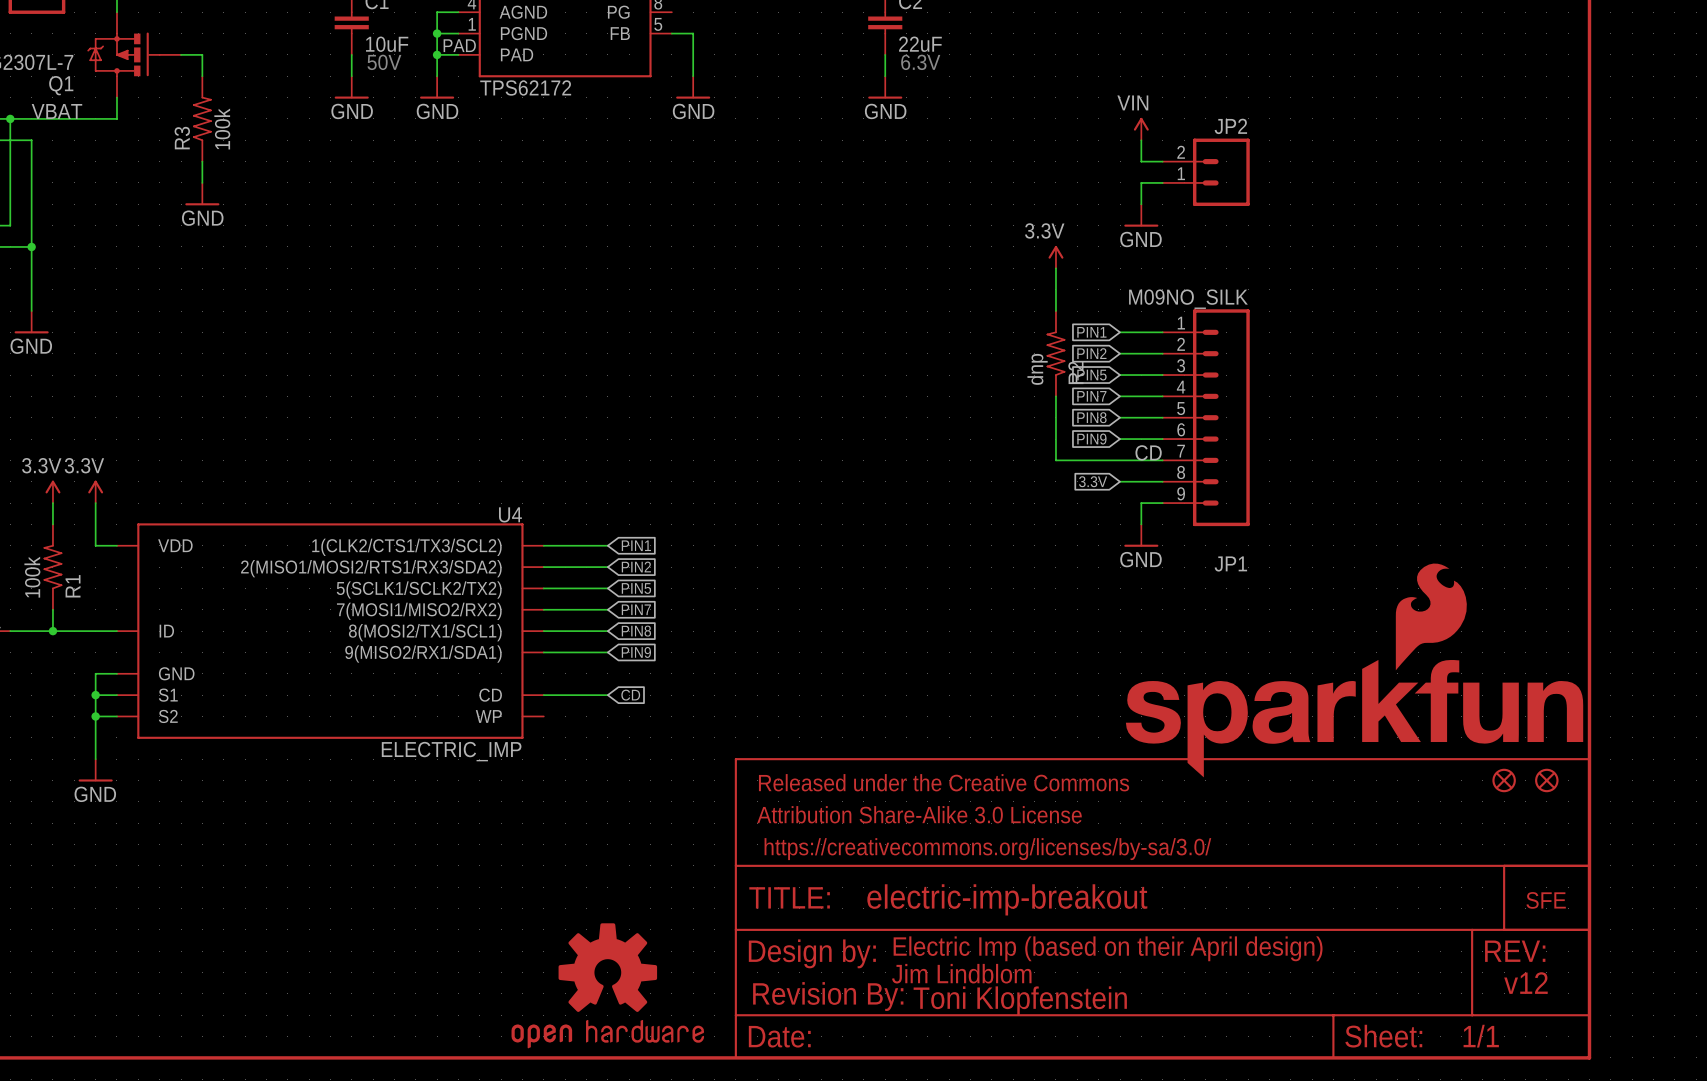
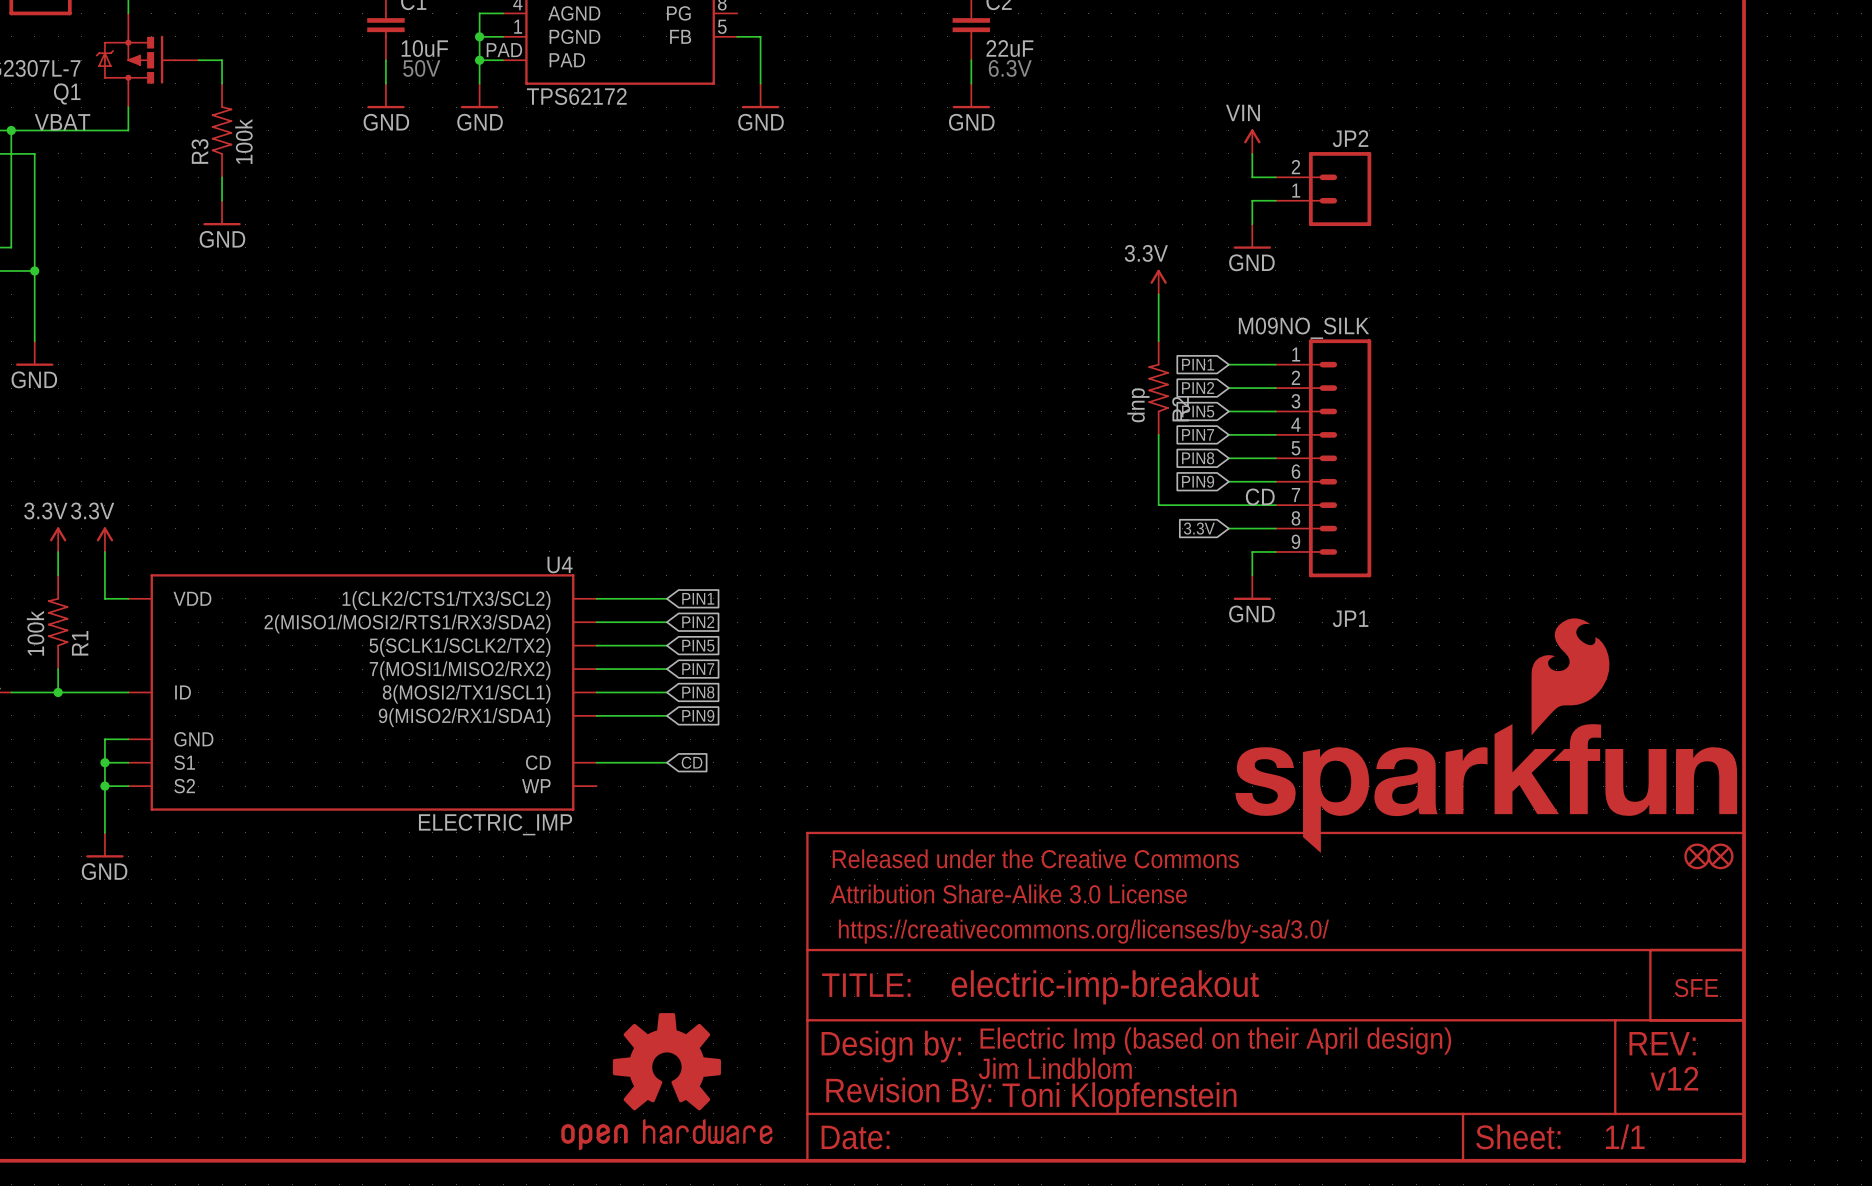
part position: (1504, 780) -> (1720, 856)

